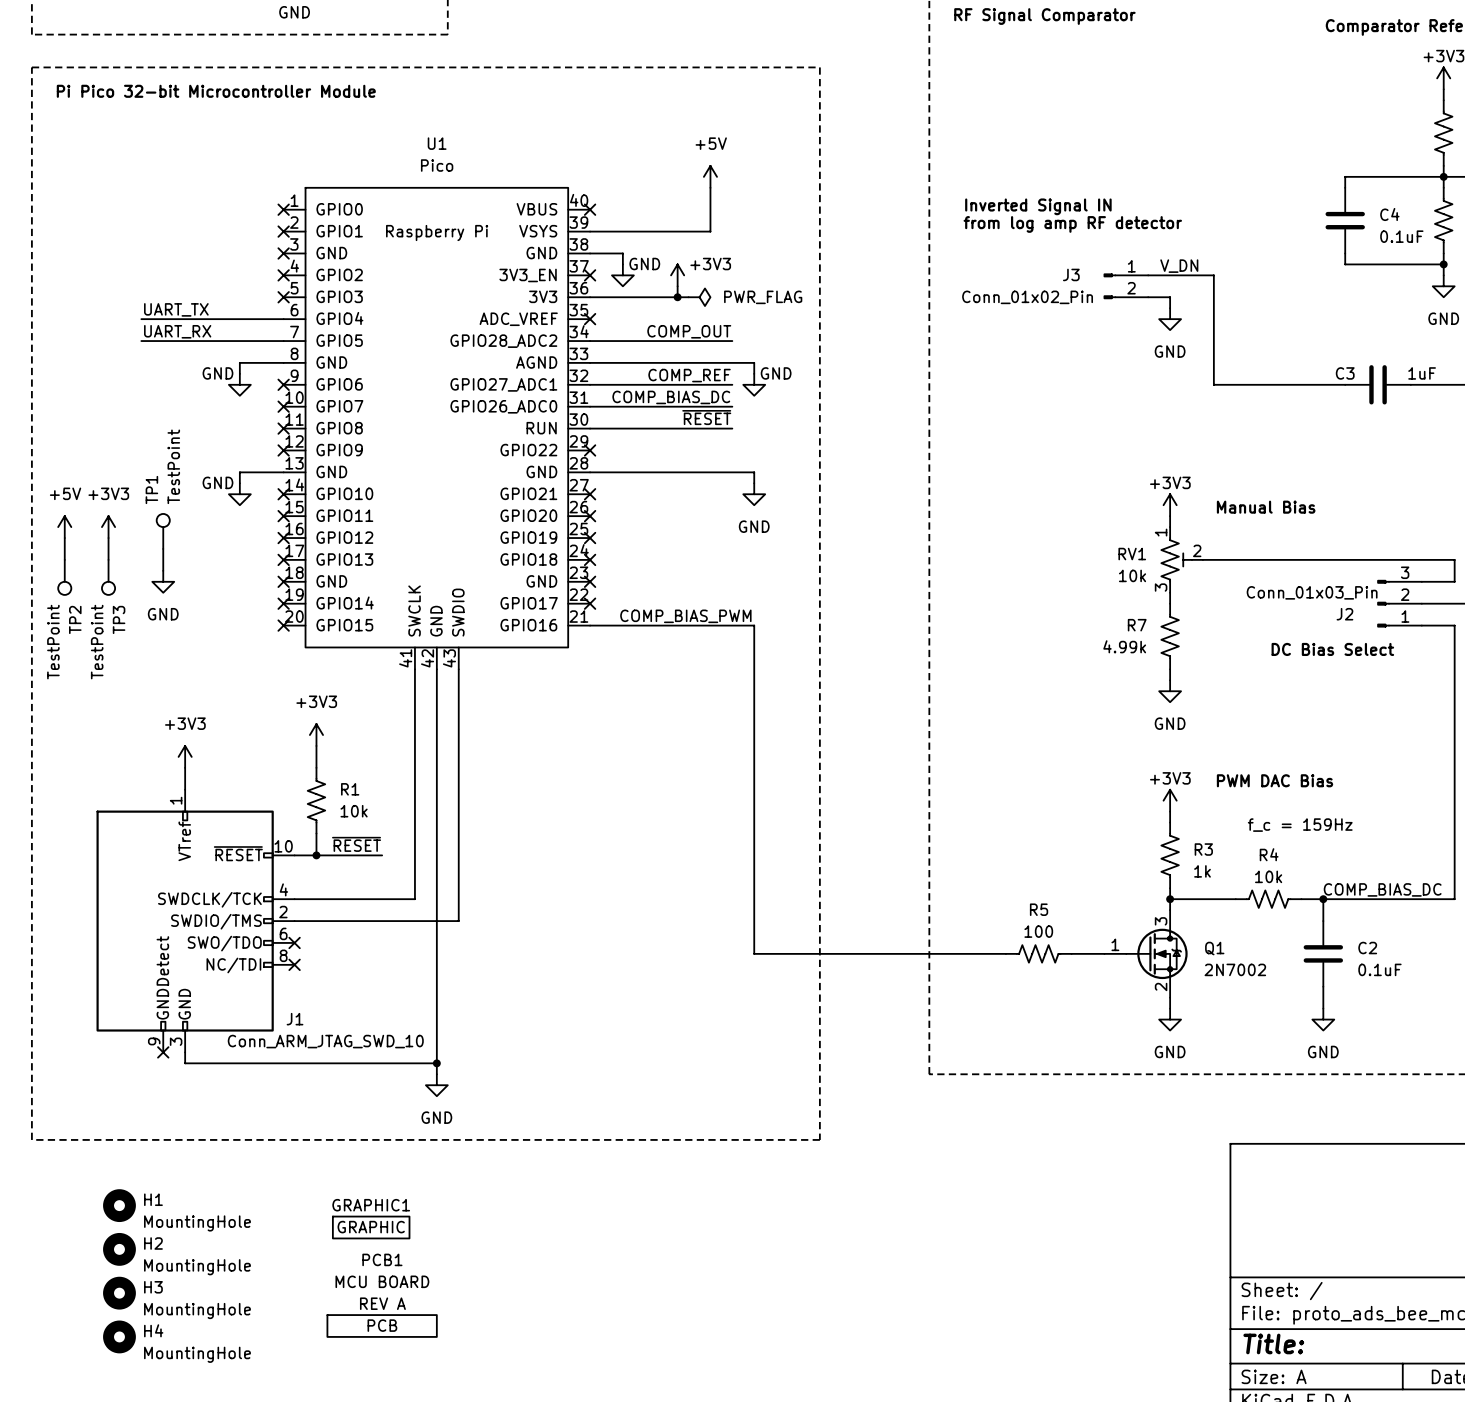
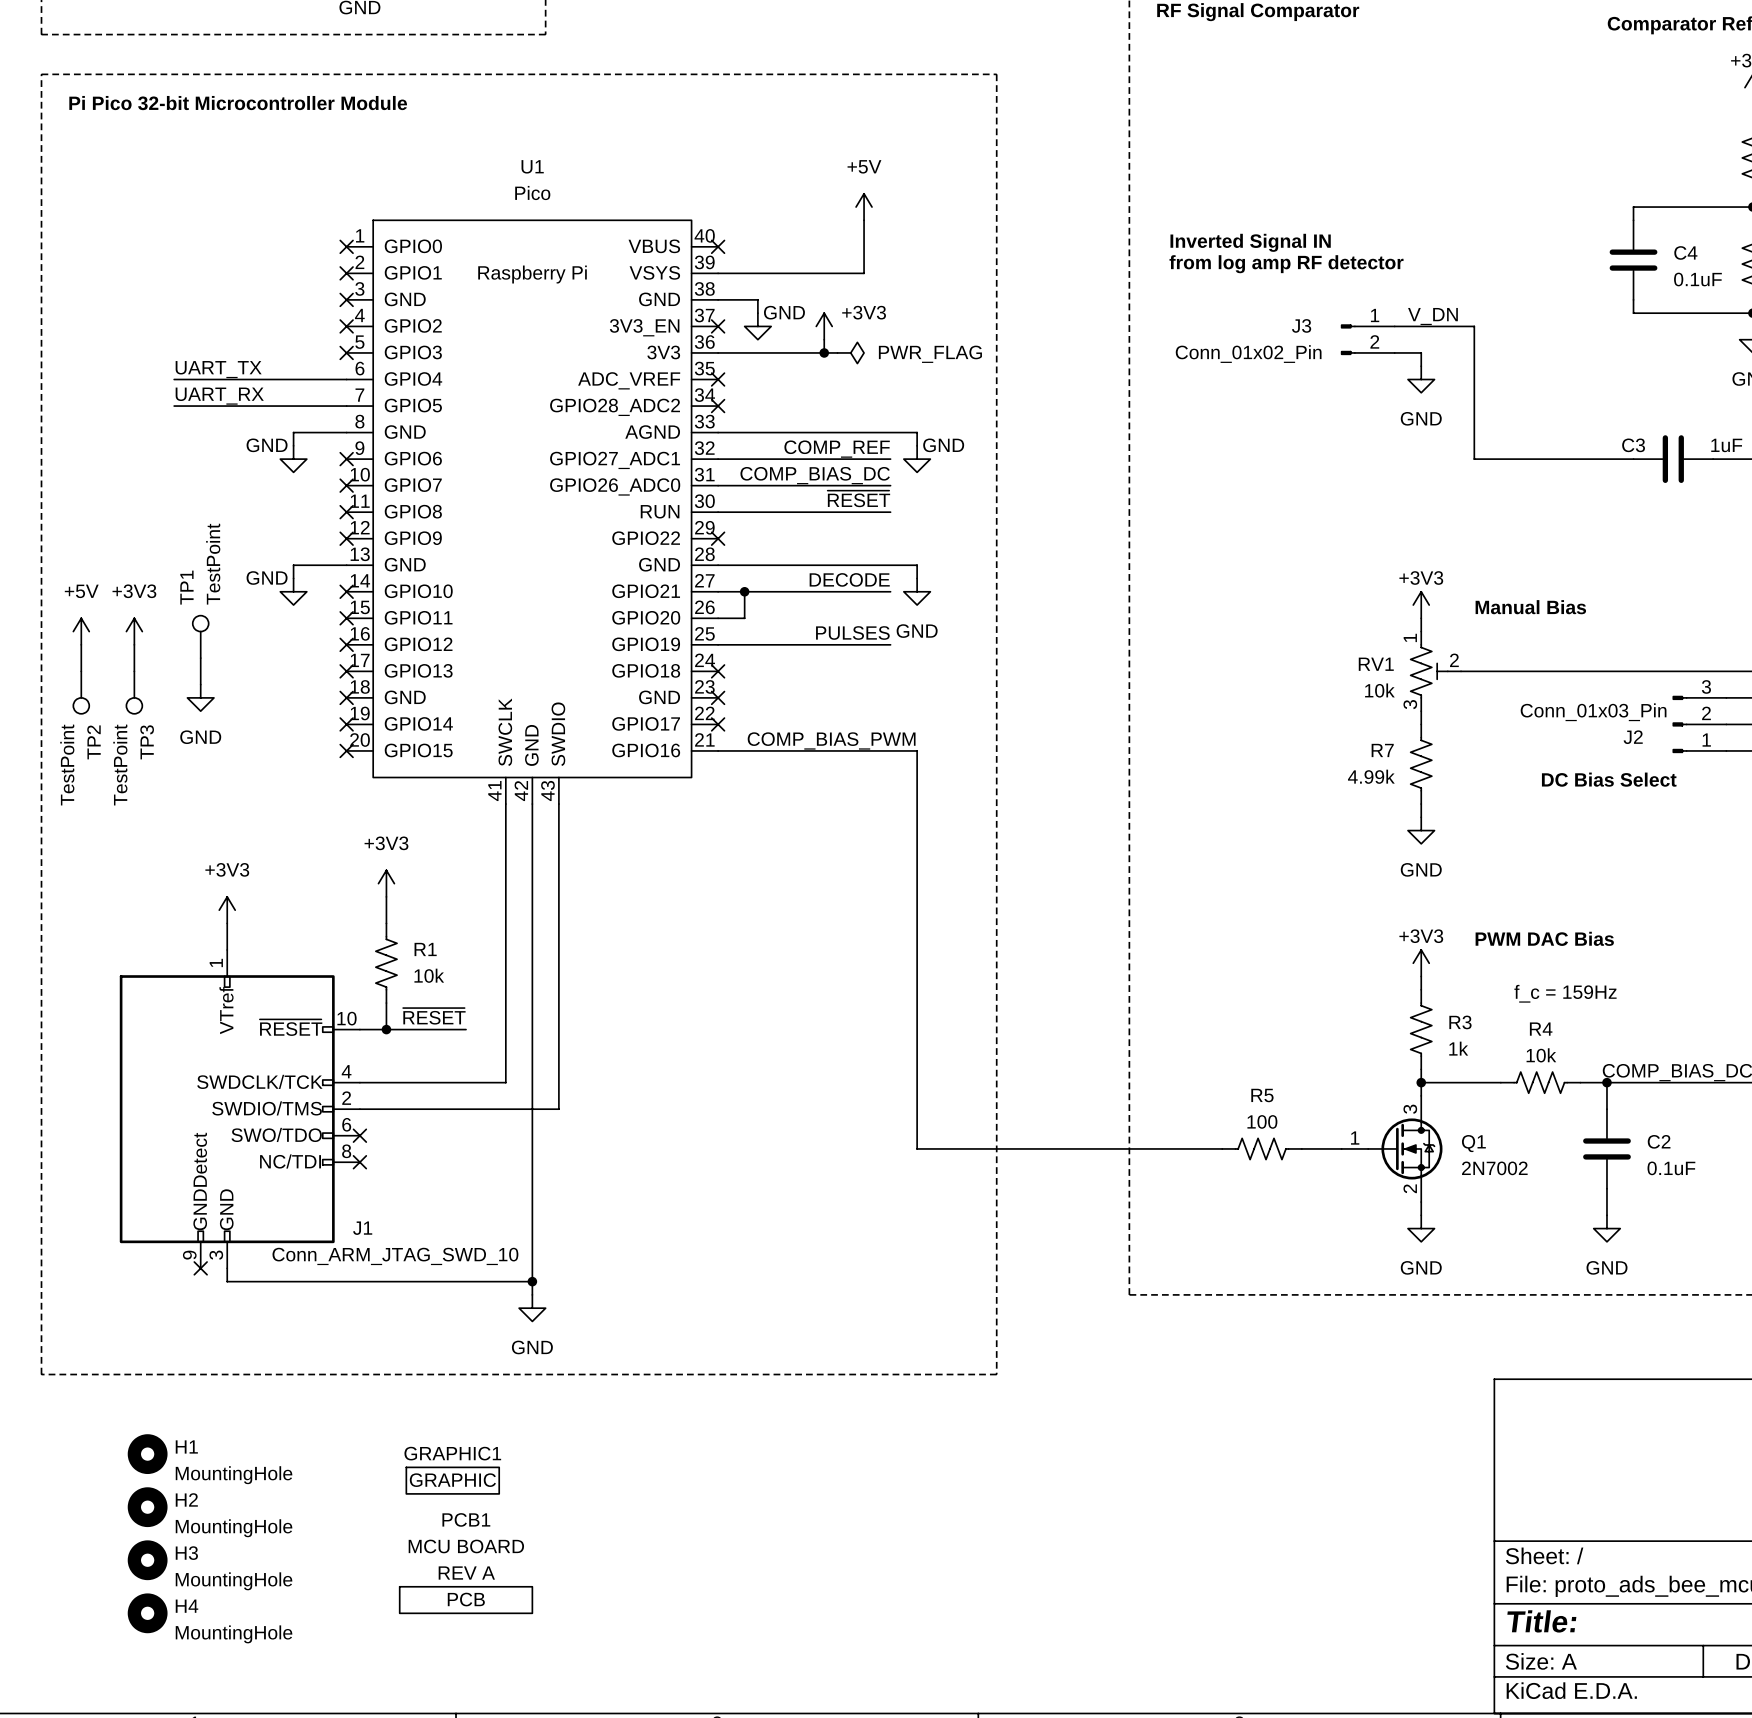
label: COMP_OUT (689, 331) -> none
wire: (590, 341) (732, 341) -> (718, 591) (890, 591)
no-connect mark: none -> (718, 406)
label: none -> DECODE (849, 579)
no-connect mark: (590, 494) -> none
wire: none -> (744, 591) (744, 618) (718, 618)
junction: none -> (744, 591)
no-connect mark: (590, 516) -> none
label: none -> PULSES (852, 632)
wire: none -> (718, 644) (890, 644)
no-connect mark: (590, 538) -> none

